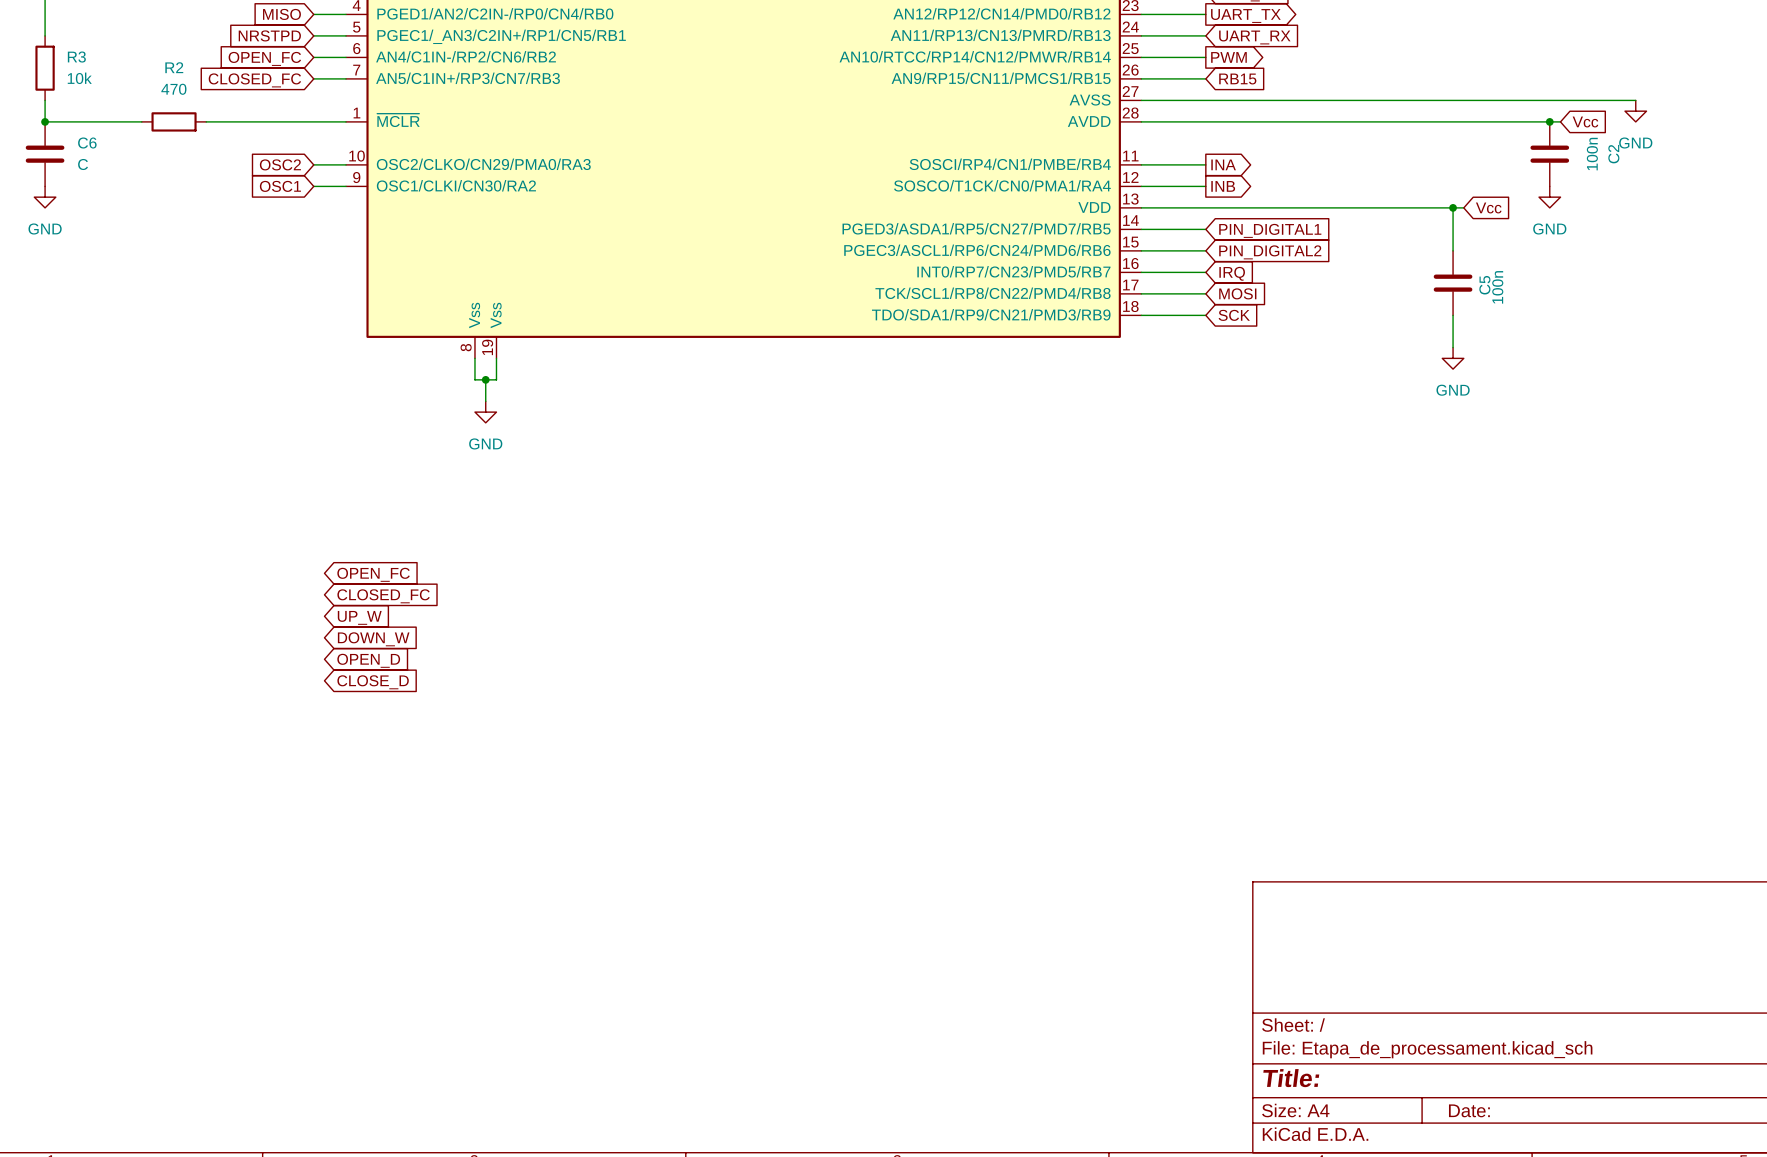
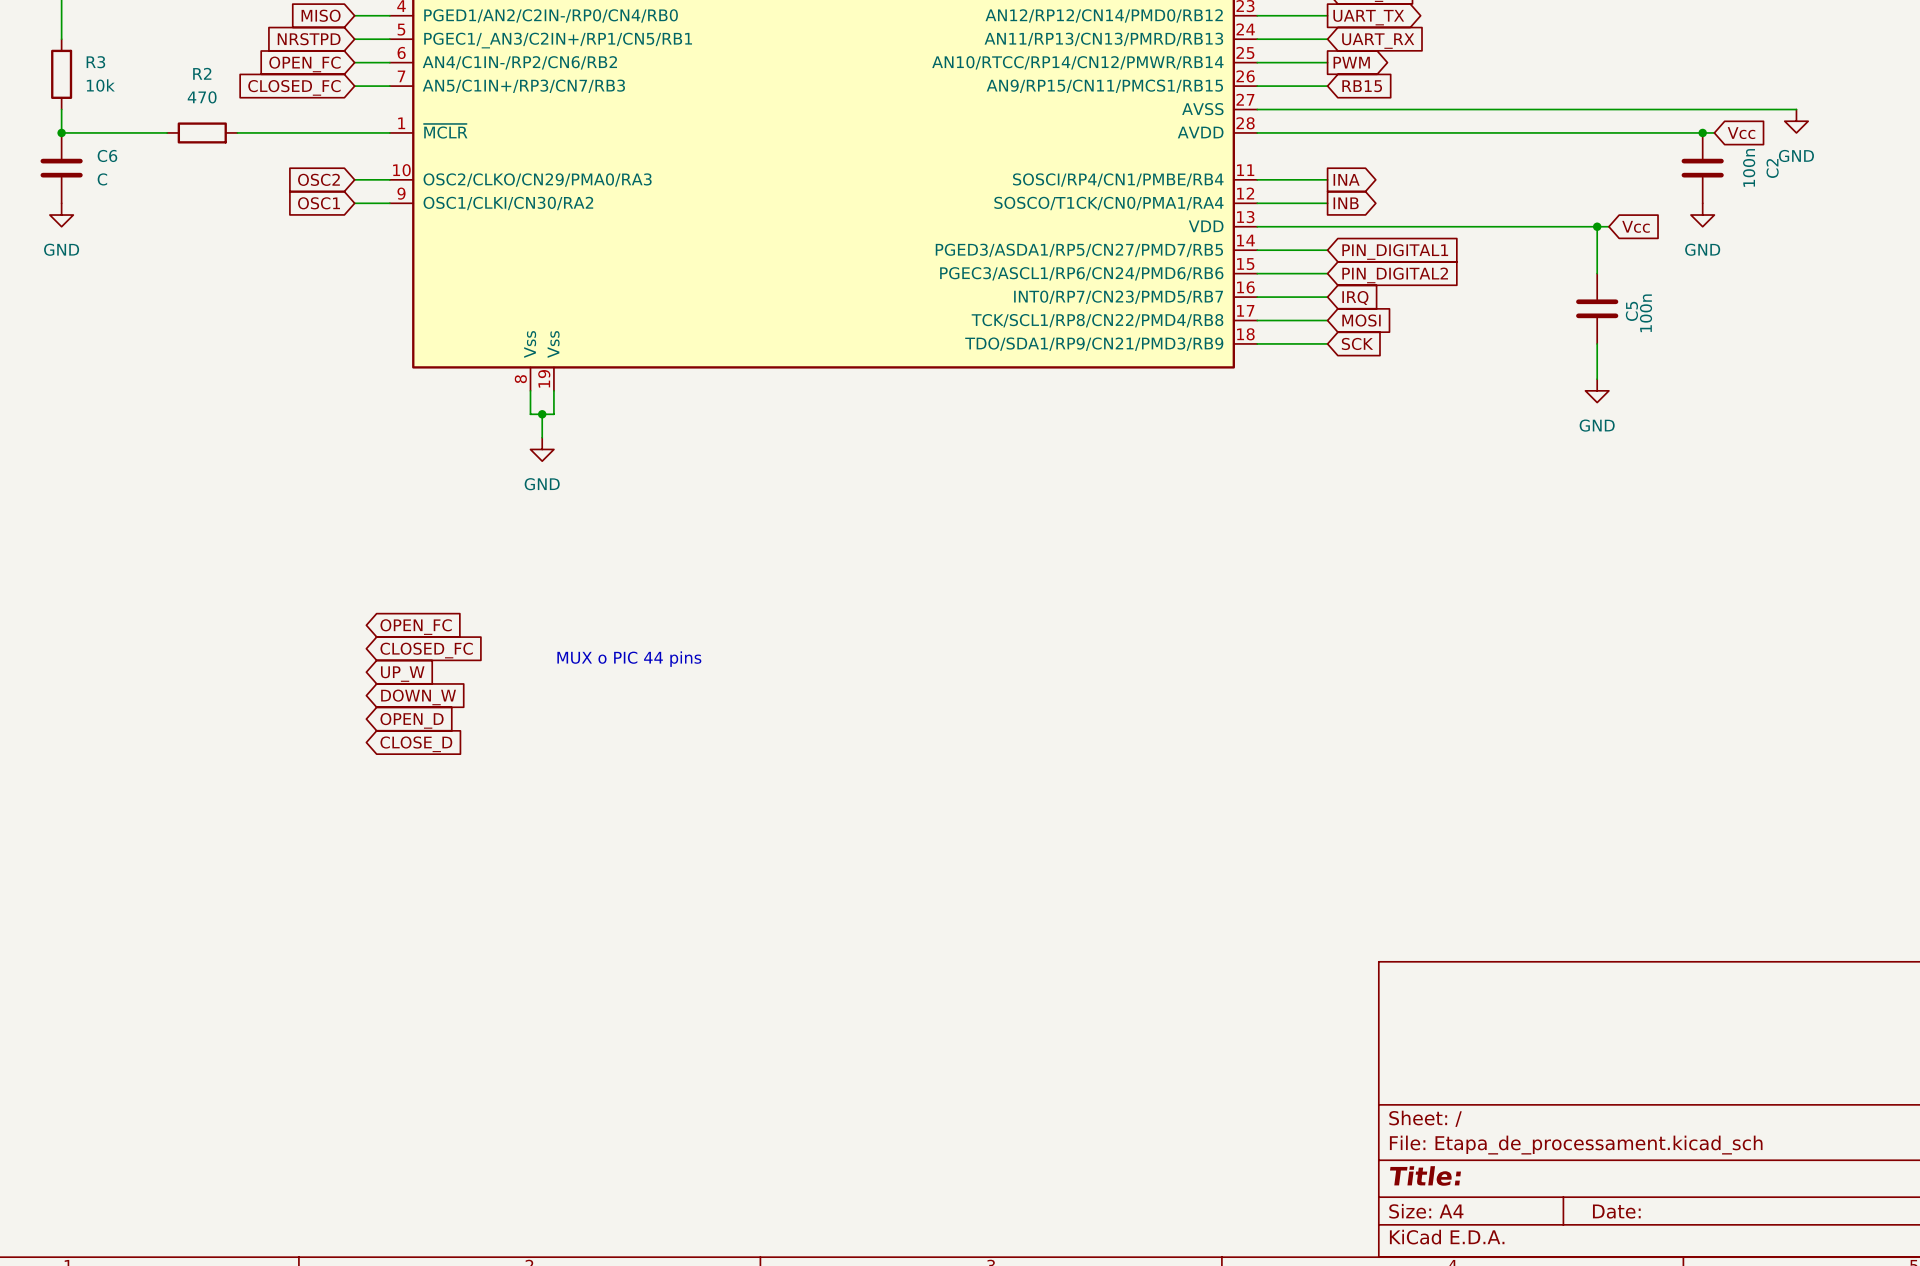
text: none -> MUX o PIC 44 pins (629, 659)

